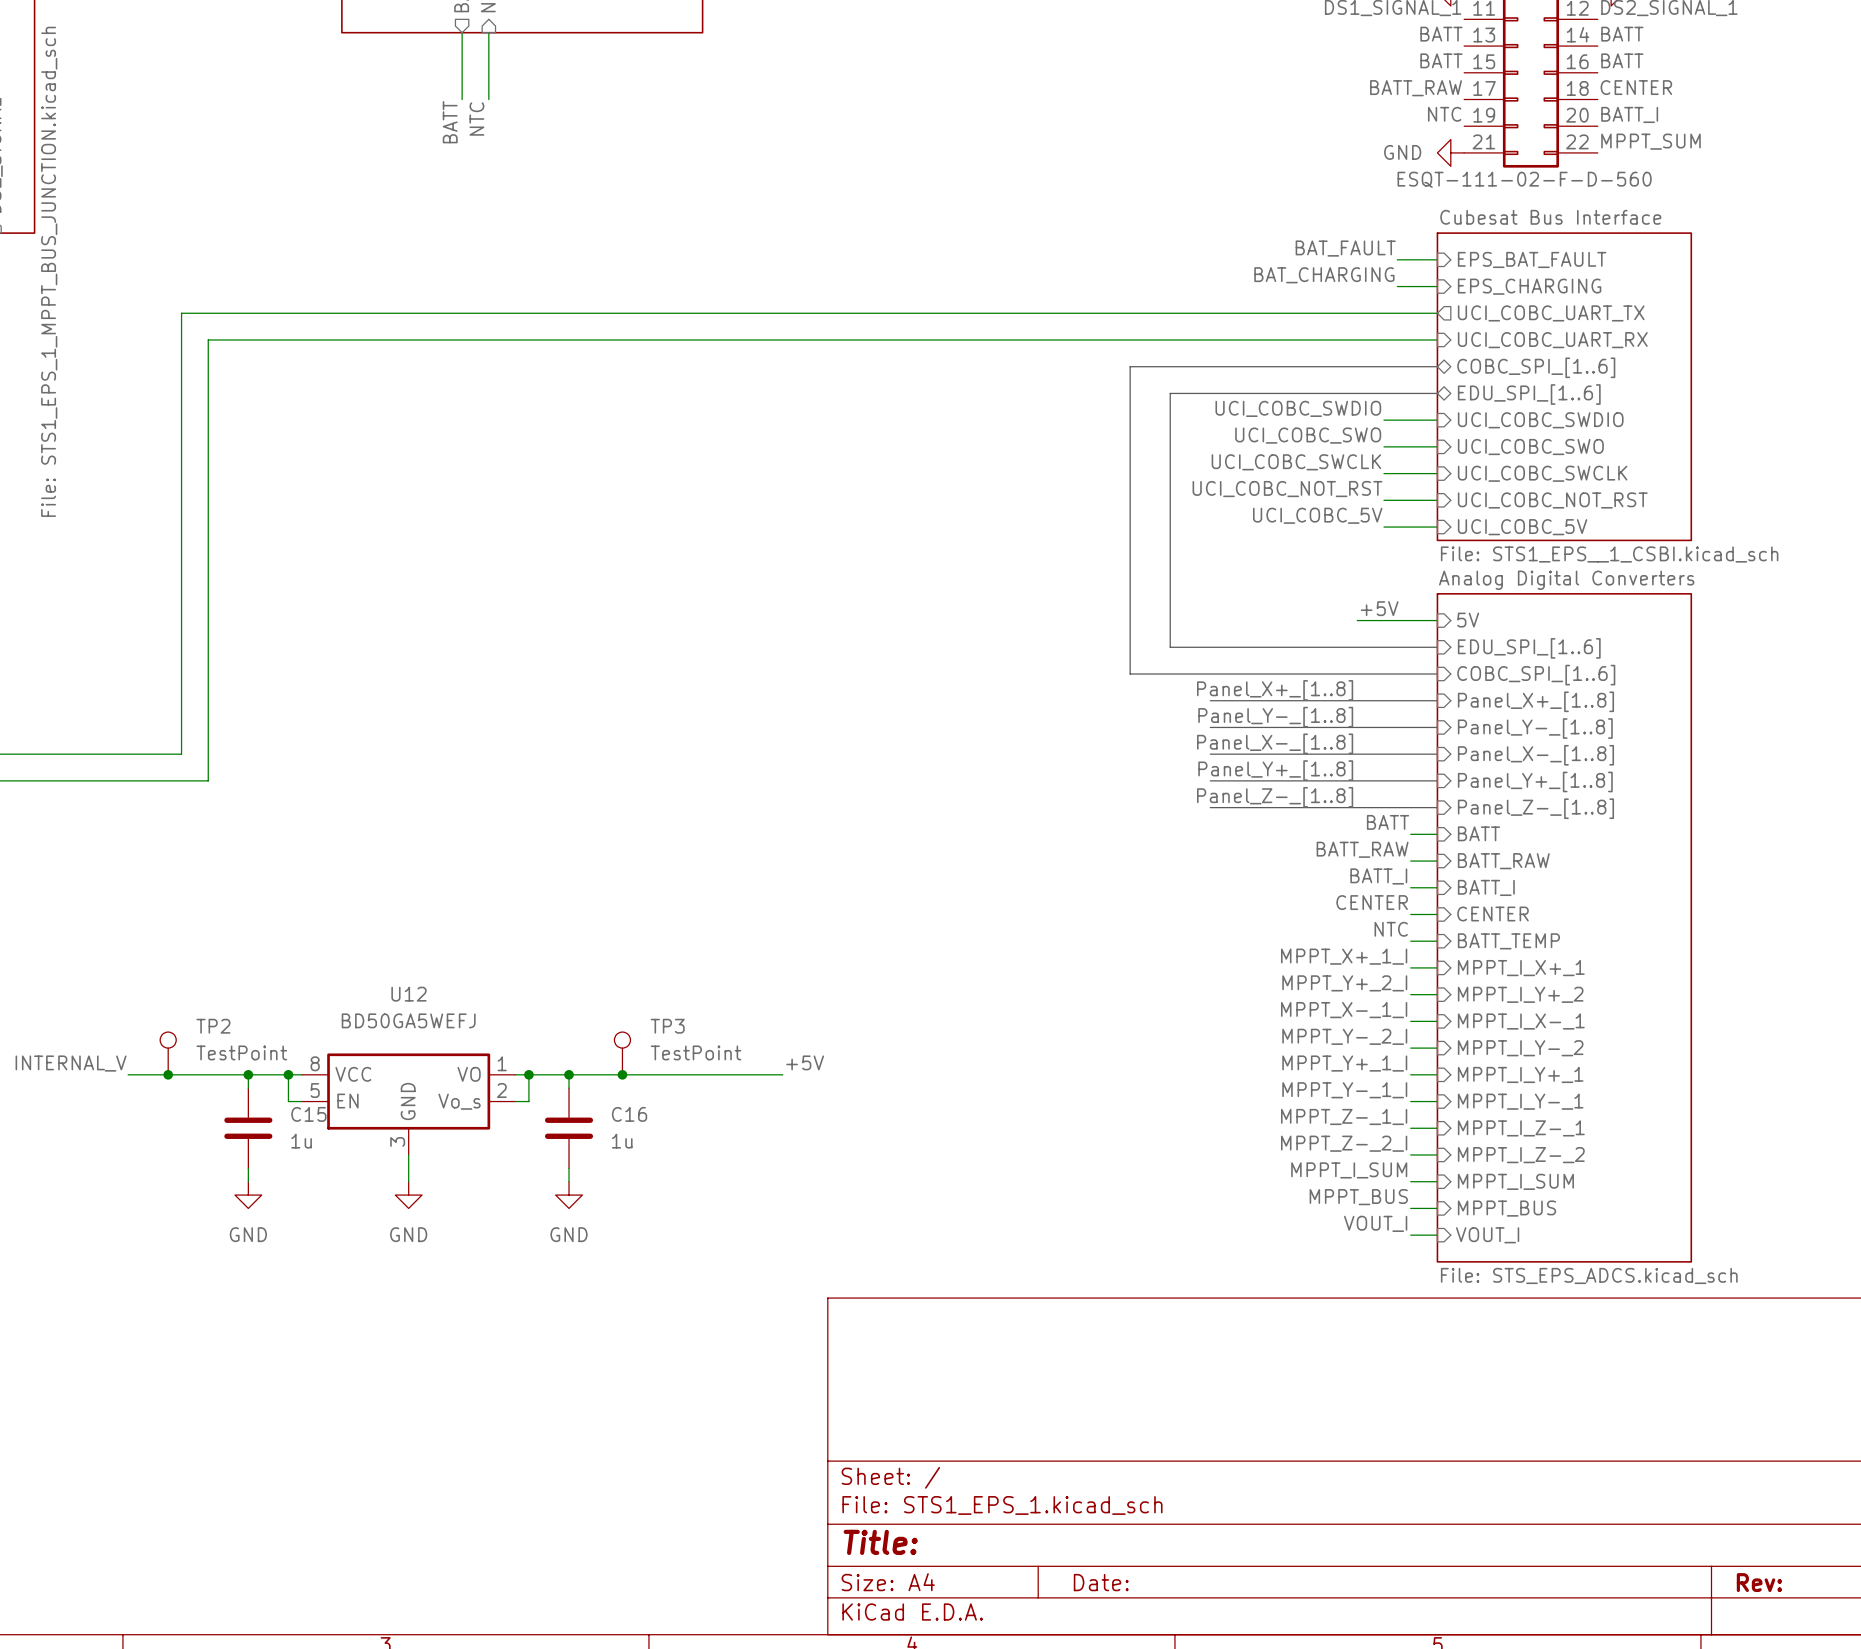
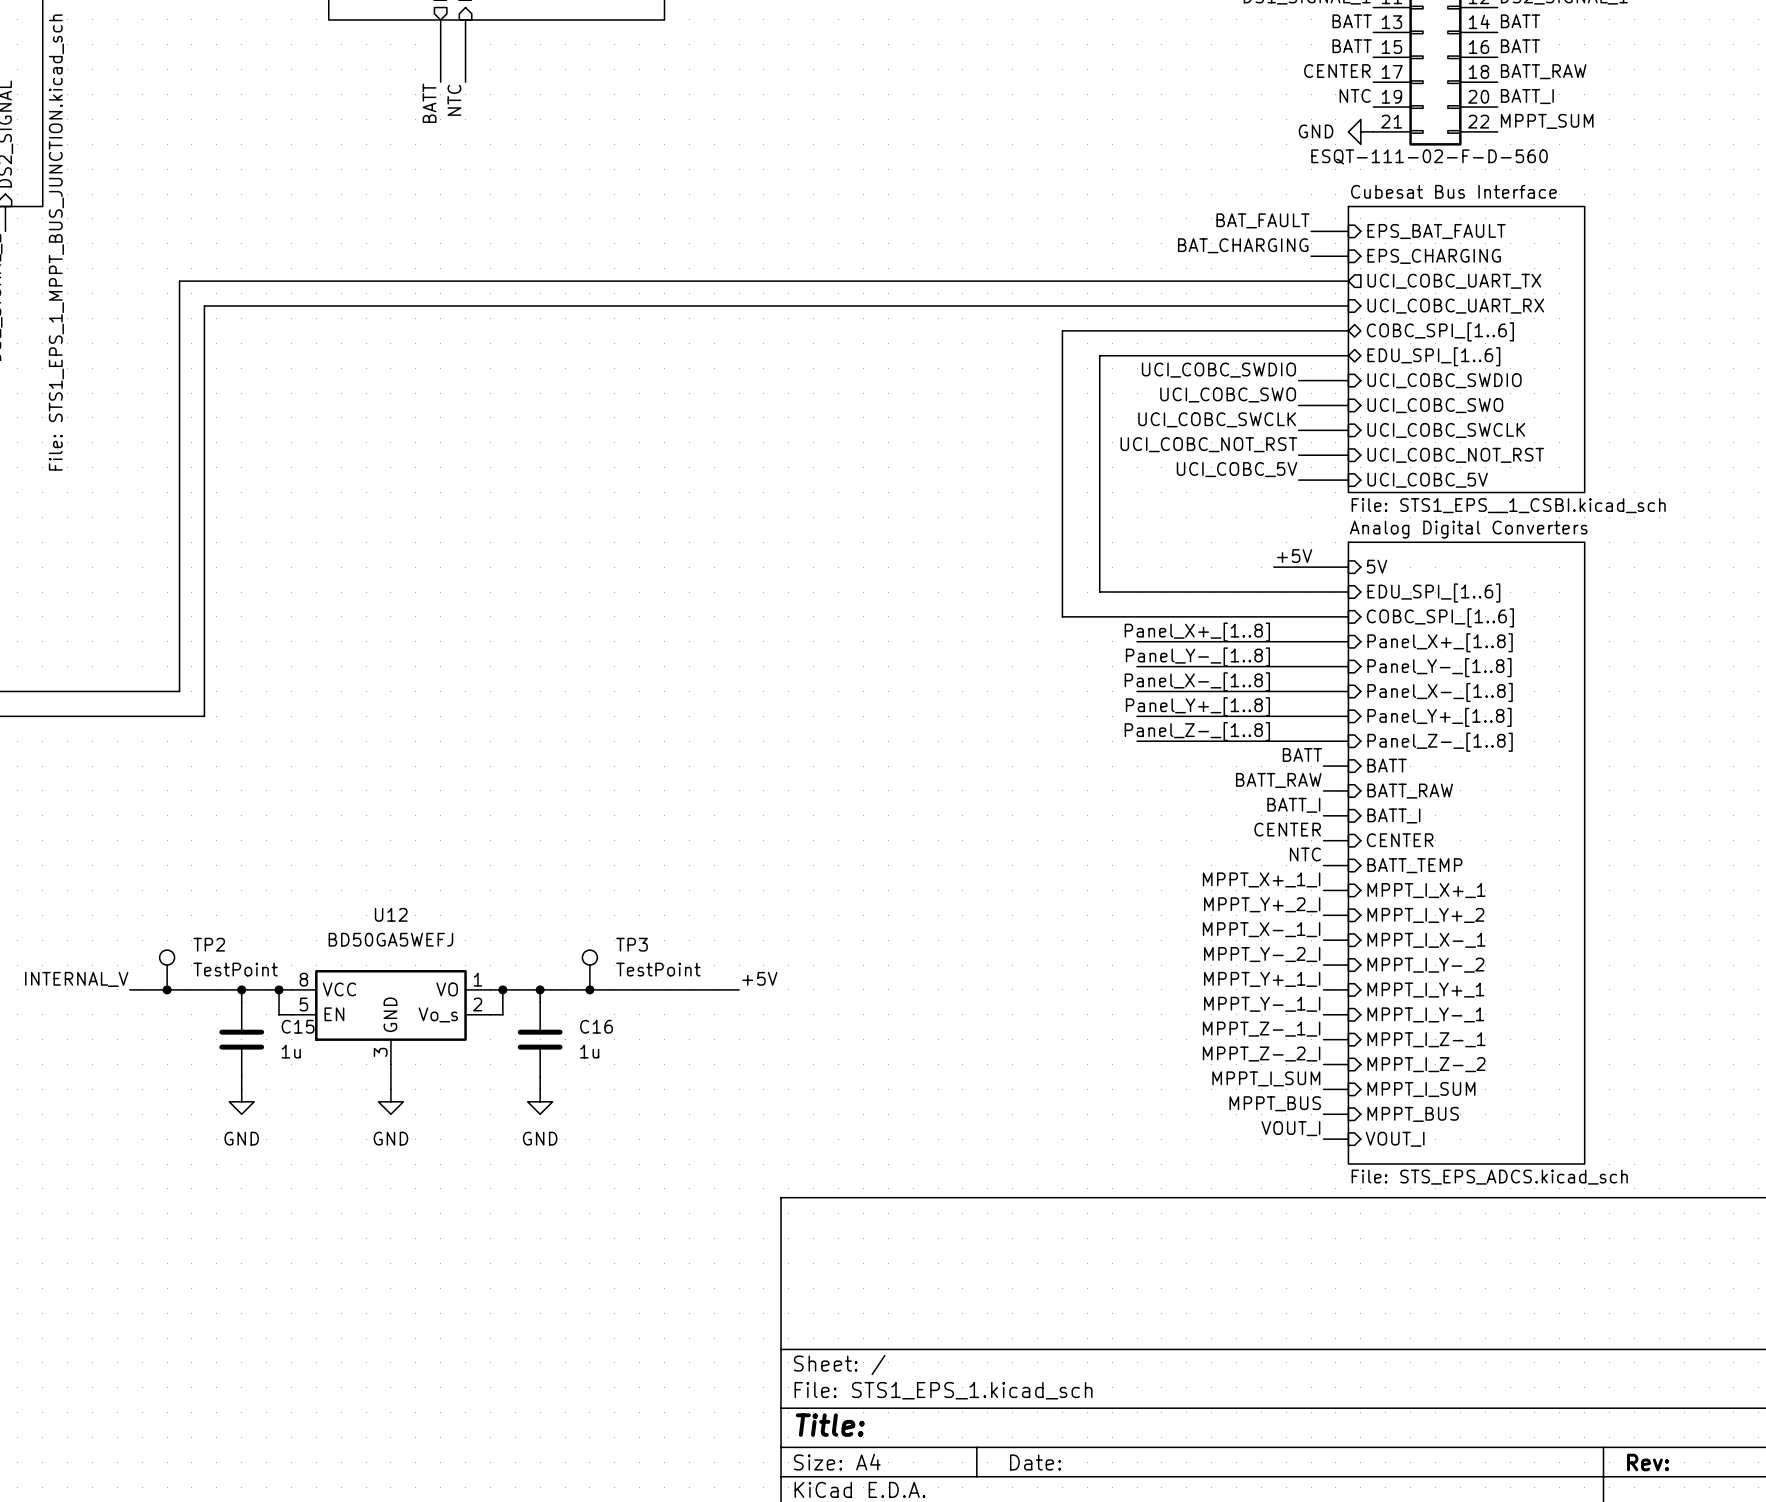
label: CENTER (1636, 87) -> BATT_RAW (1543, 71)
label: BATT_RAW (1416, 88) -> CENTER (1337, 71)

